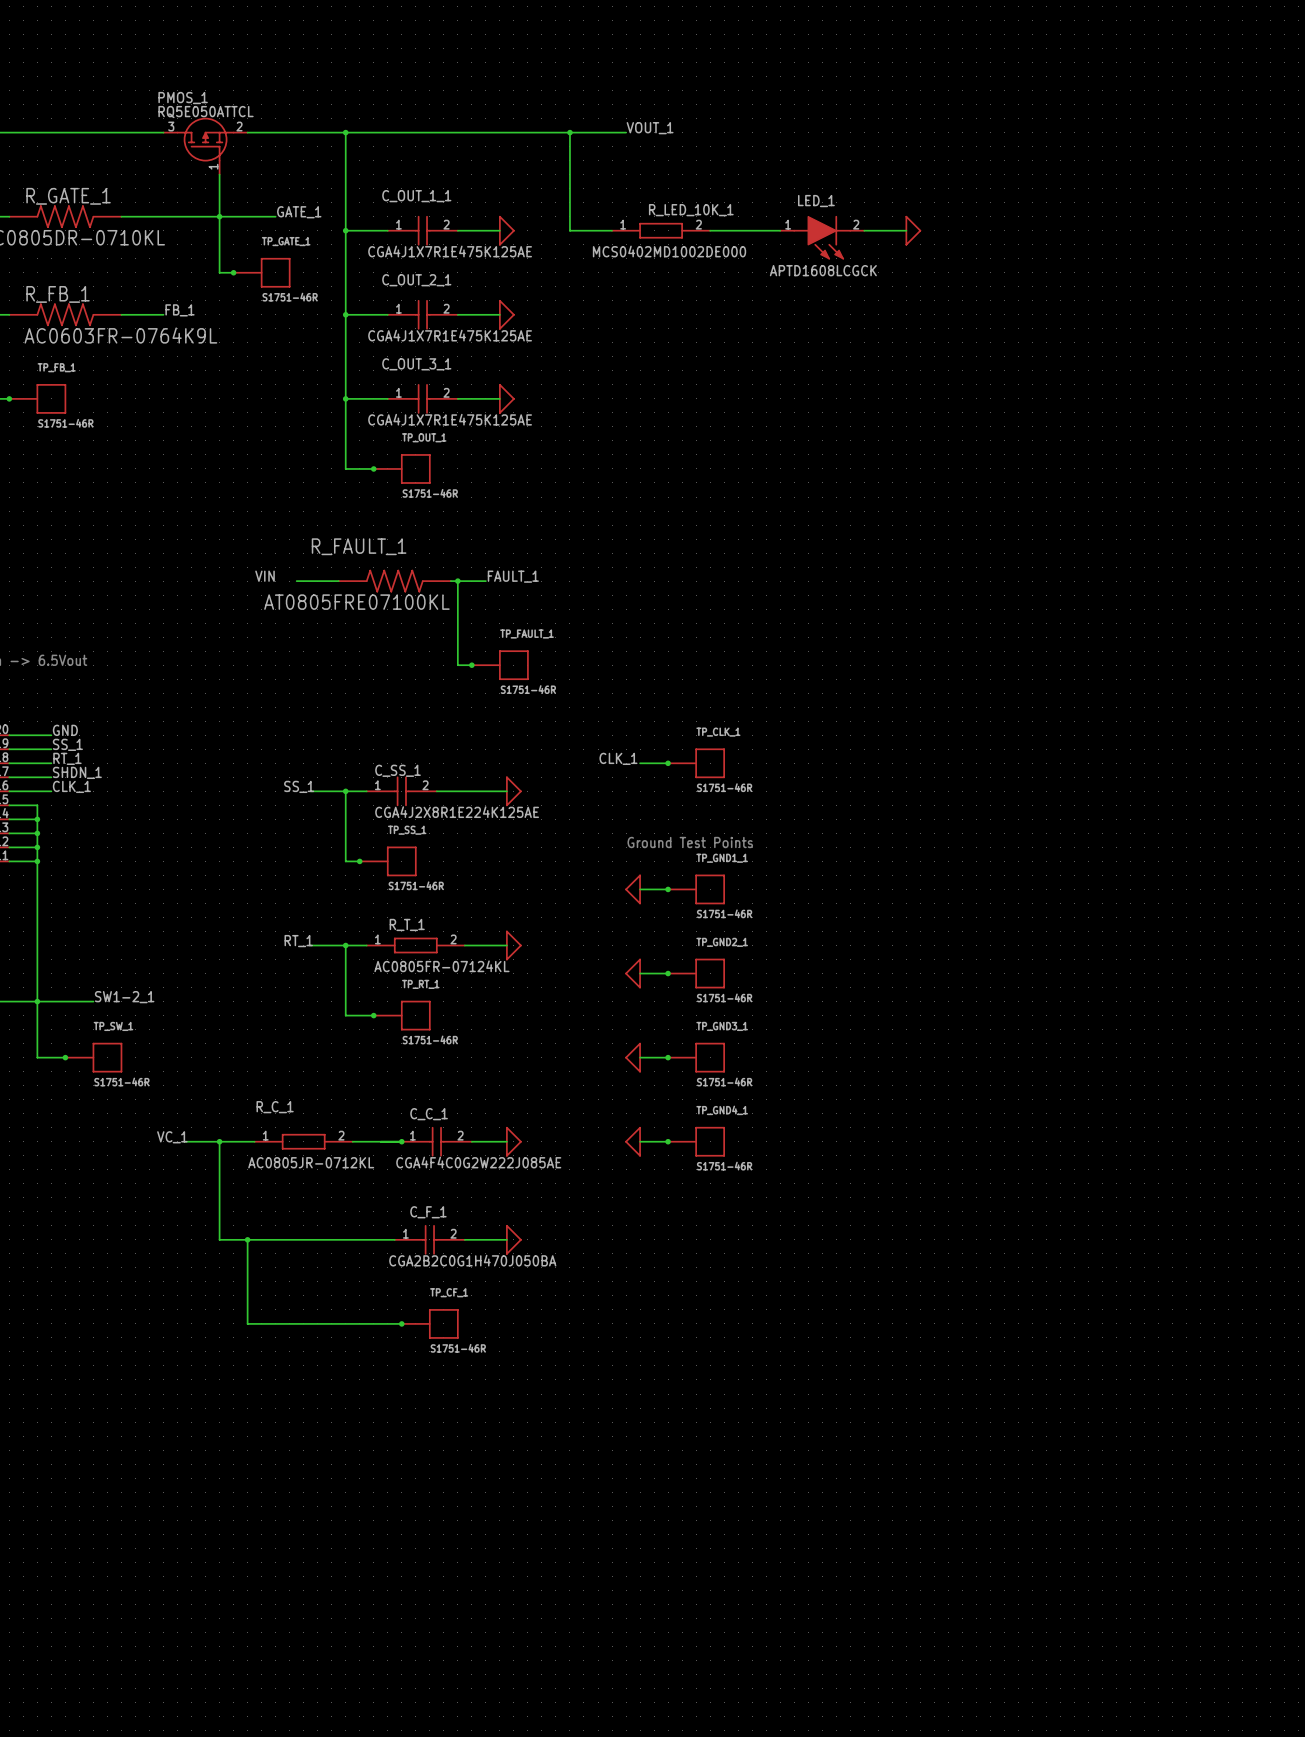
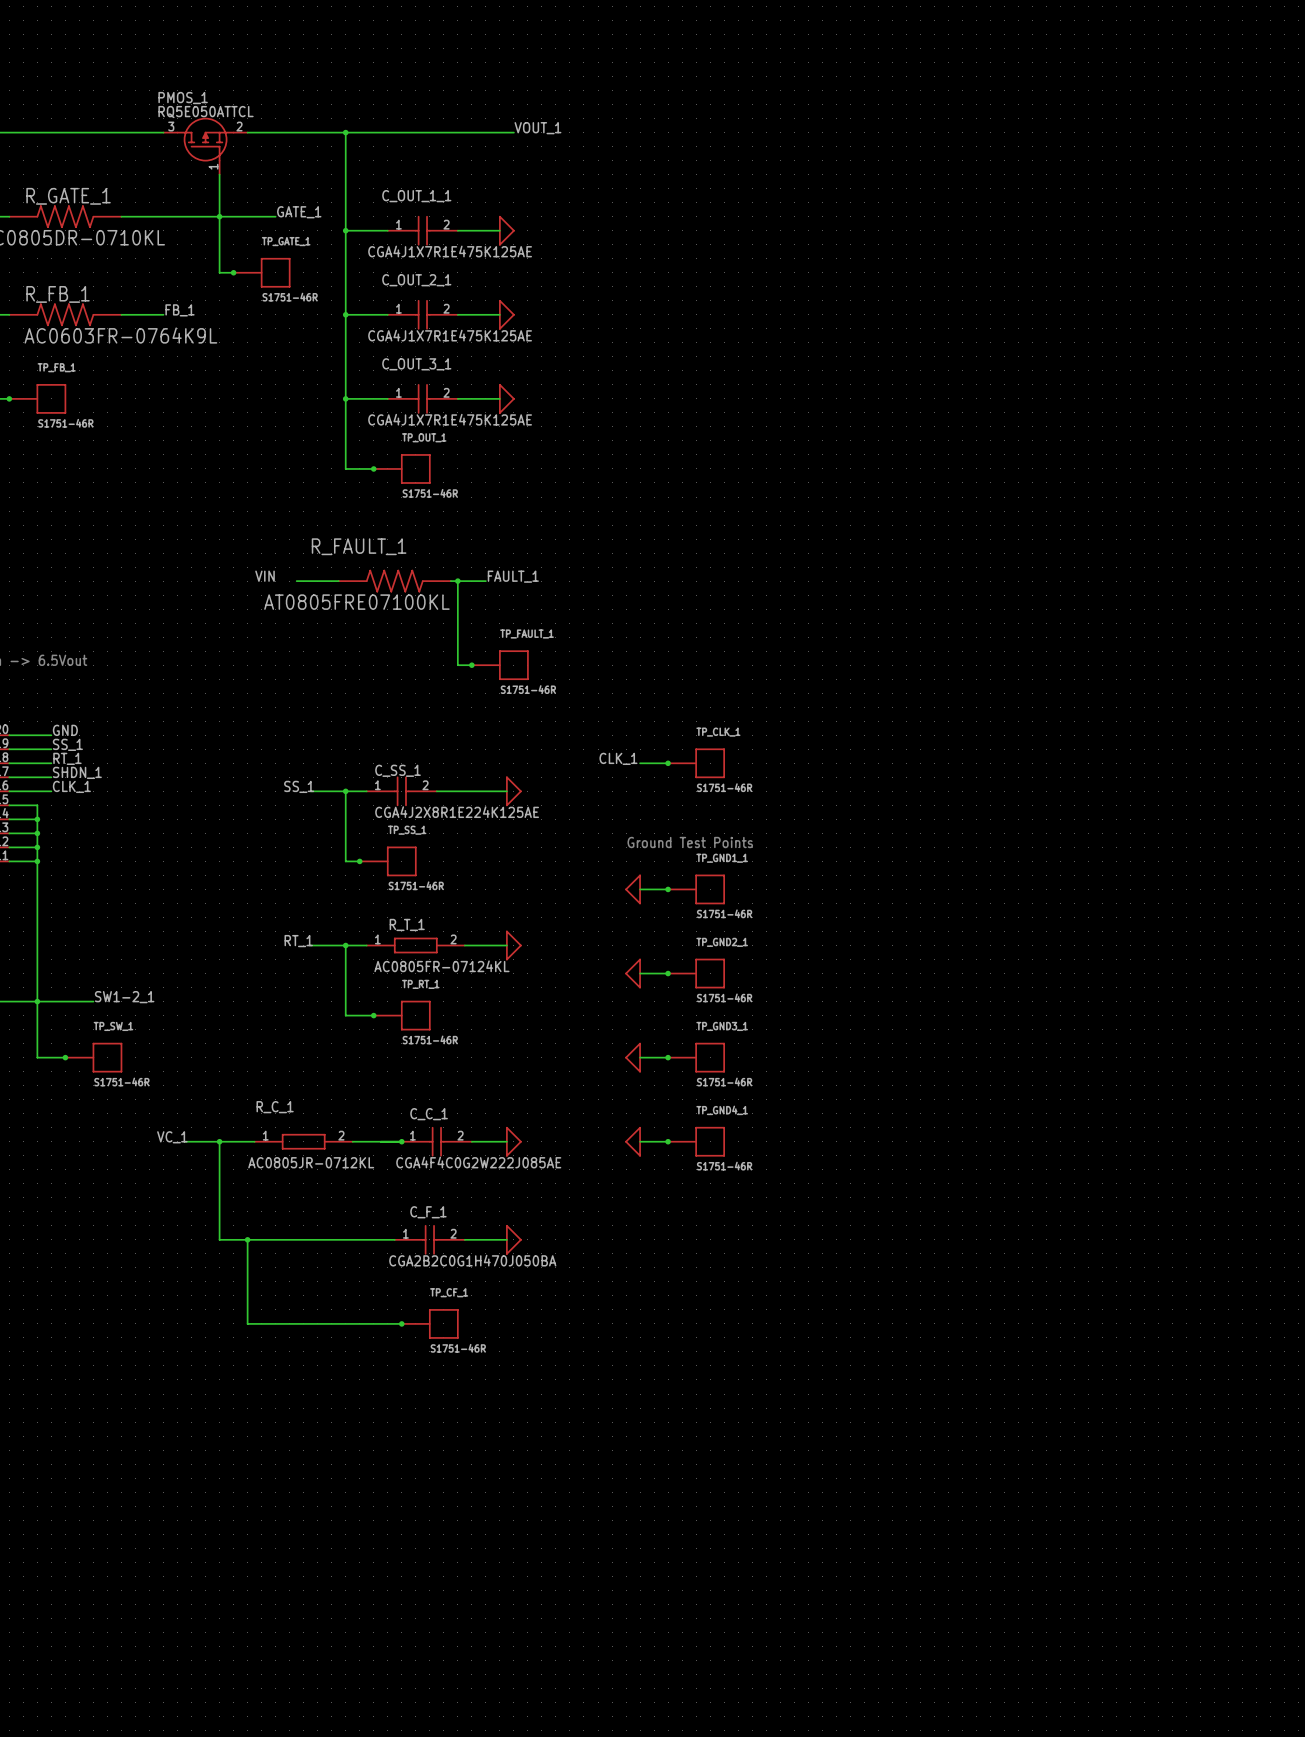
label position: VOUT_1 (650, 128) -> VOUT_1 (537, 128)
wire: (513, 132) (626, 132) -> none
wire: (569, 132) (569, 230) (612, 230) -> none
junction: (569, 132) -> none
R_LED_10K_1: MCS0402MD1002DE000 (661, 230) -> none
wire: (710, 230) (780, 230) -> none
wire: (864, 230) (906, 230) -> none
power symbol: (913, 230) -> none
LED_1: APTD1608LCGCK (822, 237) -> none

